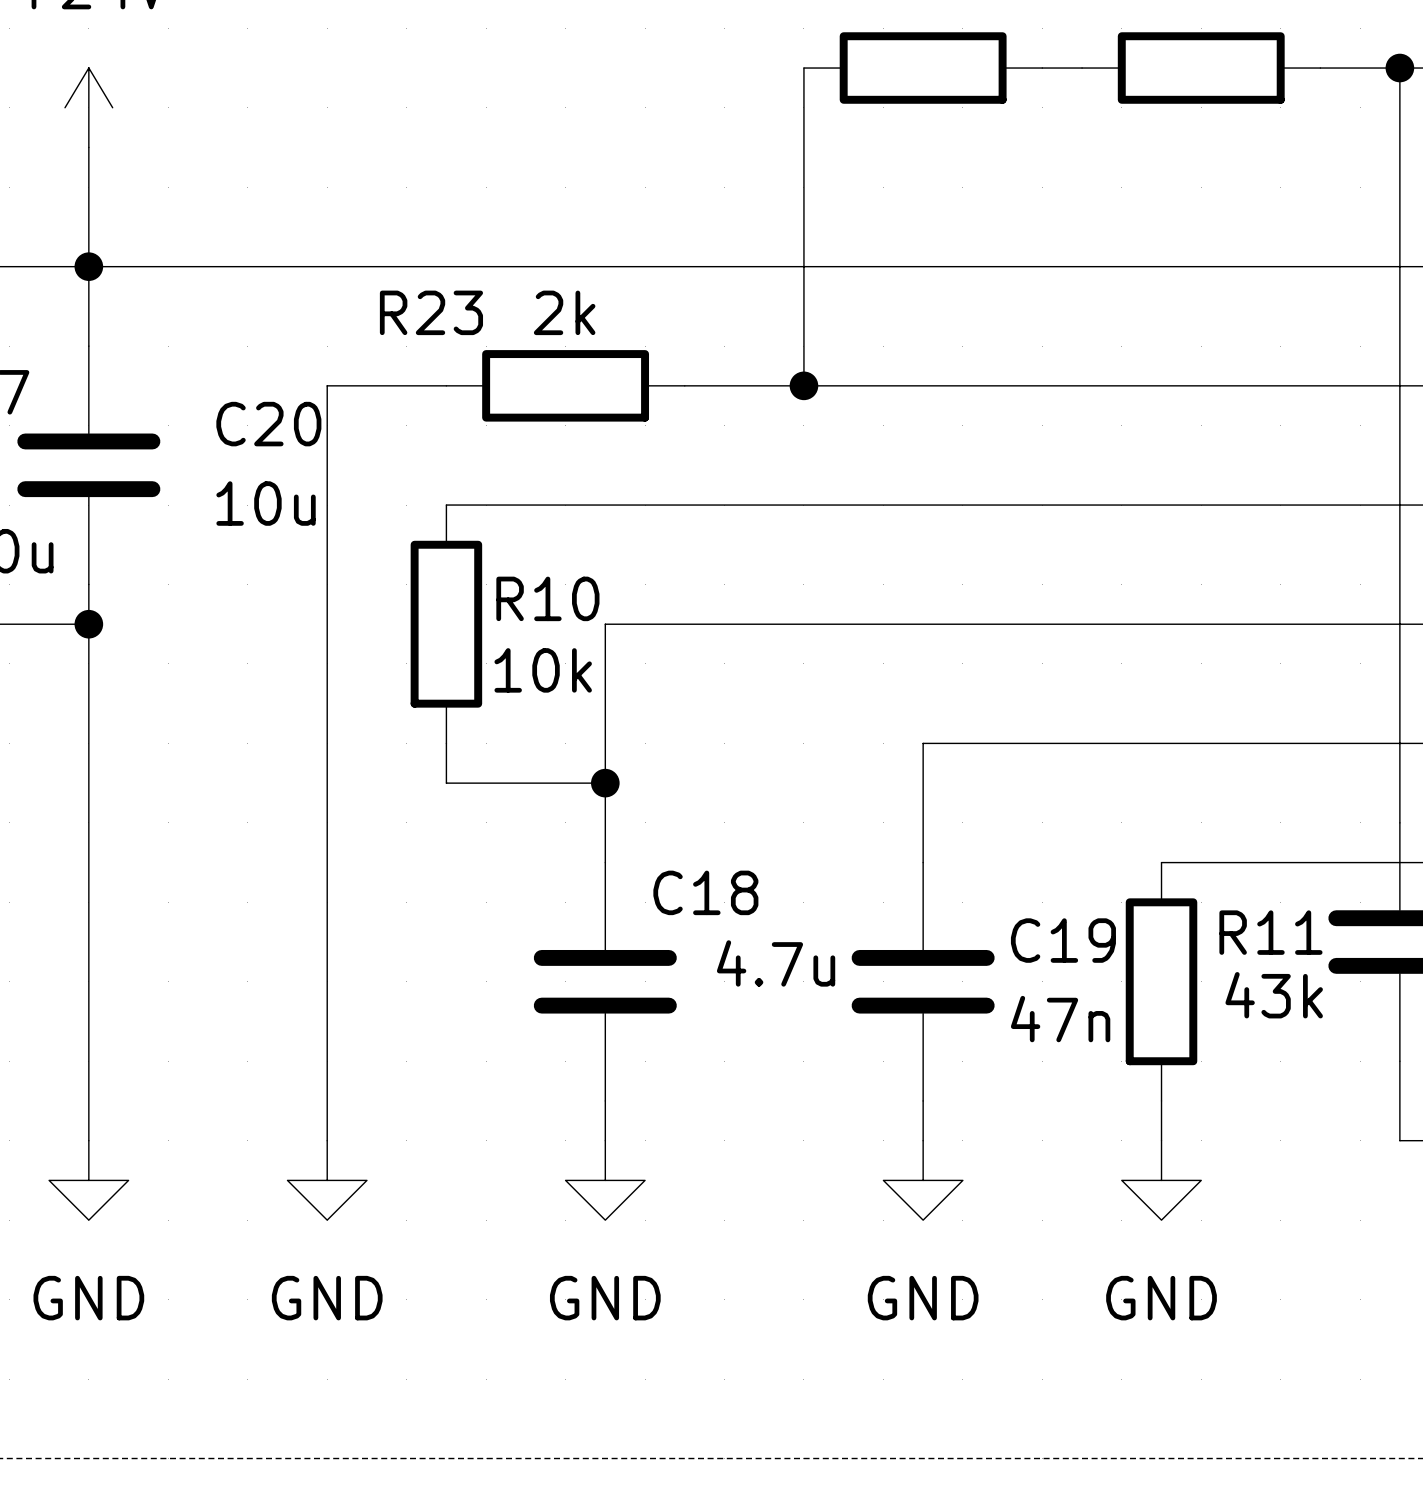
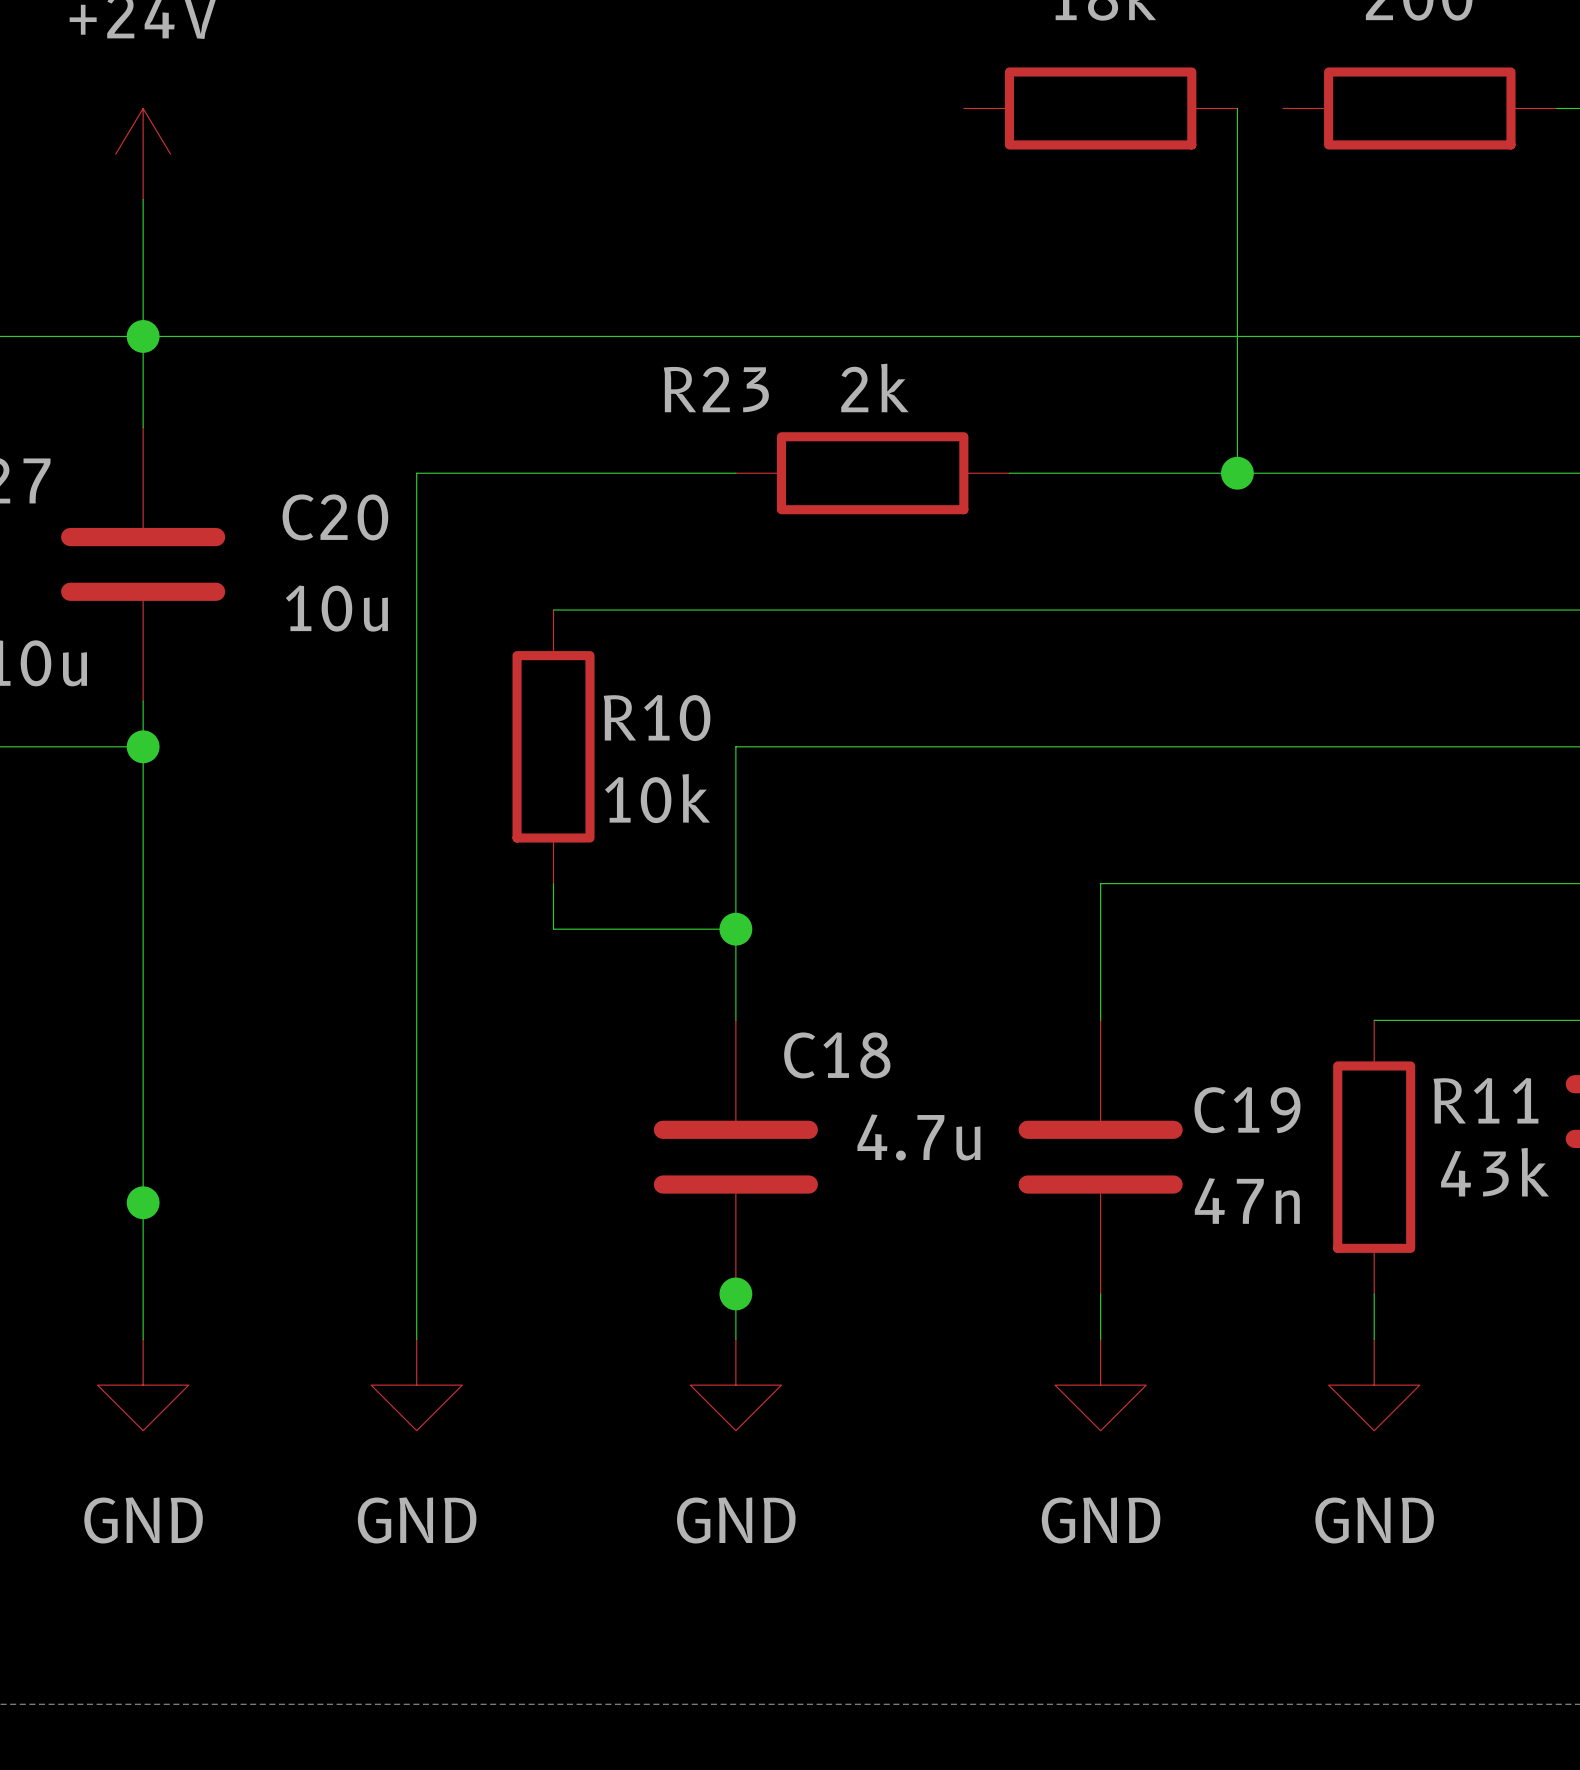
wire: (803, 68) (803, 385) -> none
wire: (1042, 68) (1082, 68) -> (1237, 108) (1237, 473)
R23 position: (565, 385) -> (872, 473)
wire: (684, 385) (843, 385) -> (553, 473) (735, 473)
junction: (803, 385) -> none
junction: none -> (1237, 473)
junction: none -> (143, 1202)
junction: none -> (735, 1293)

